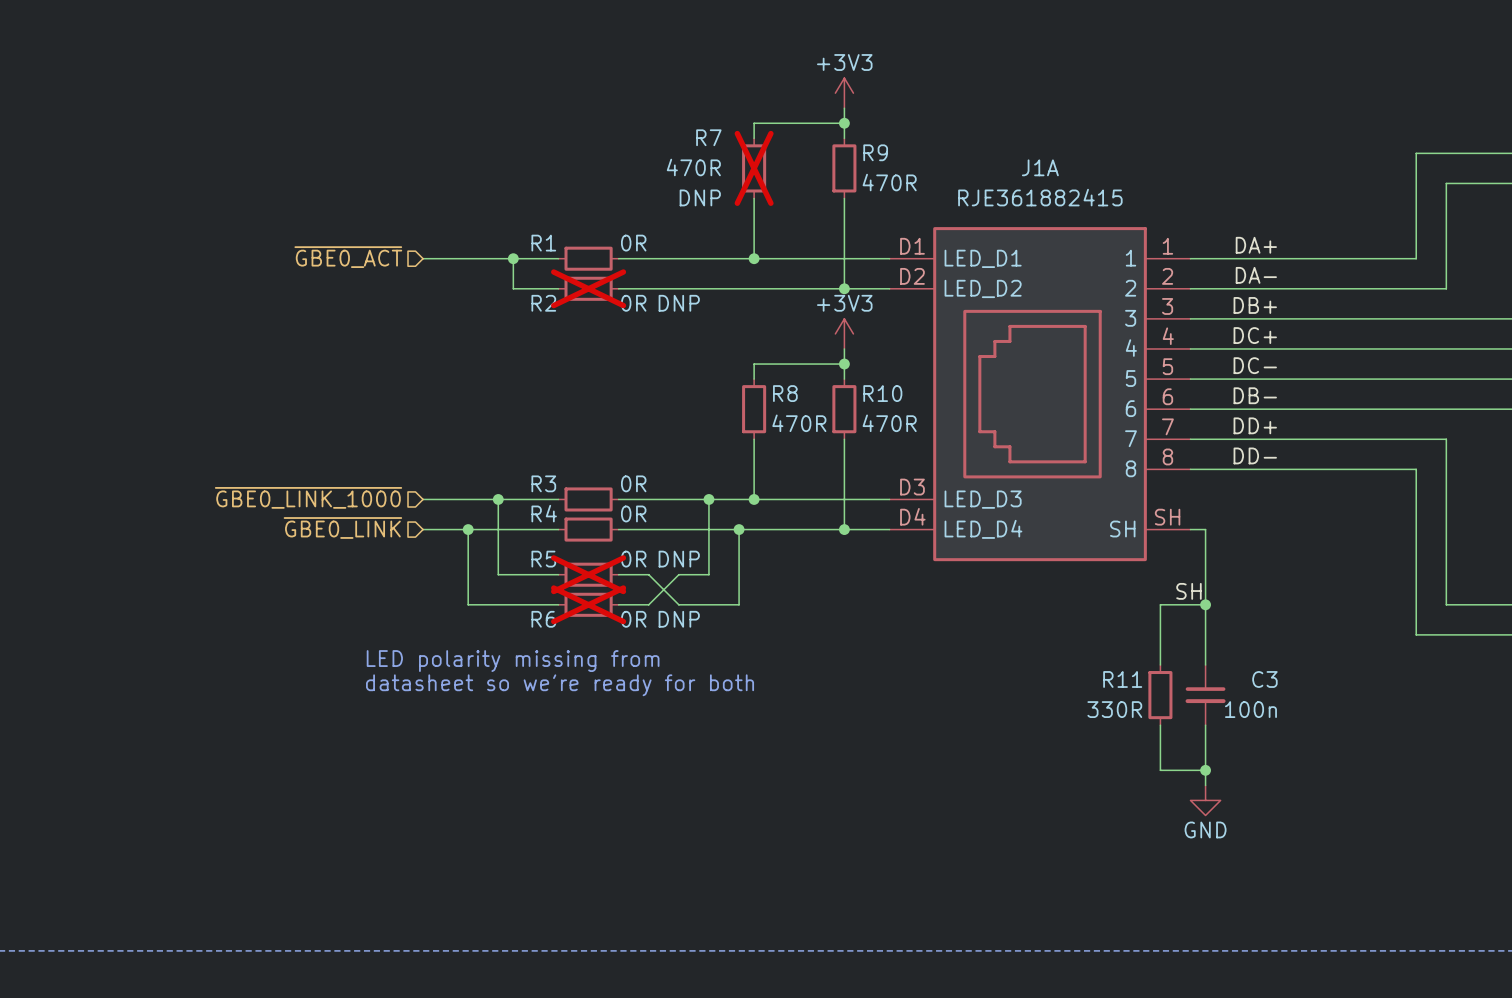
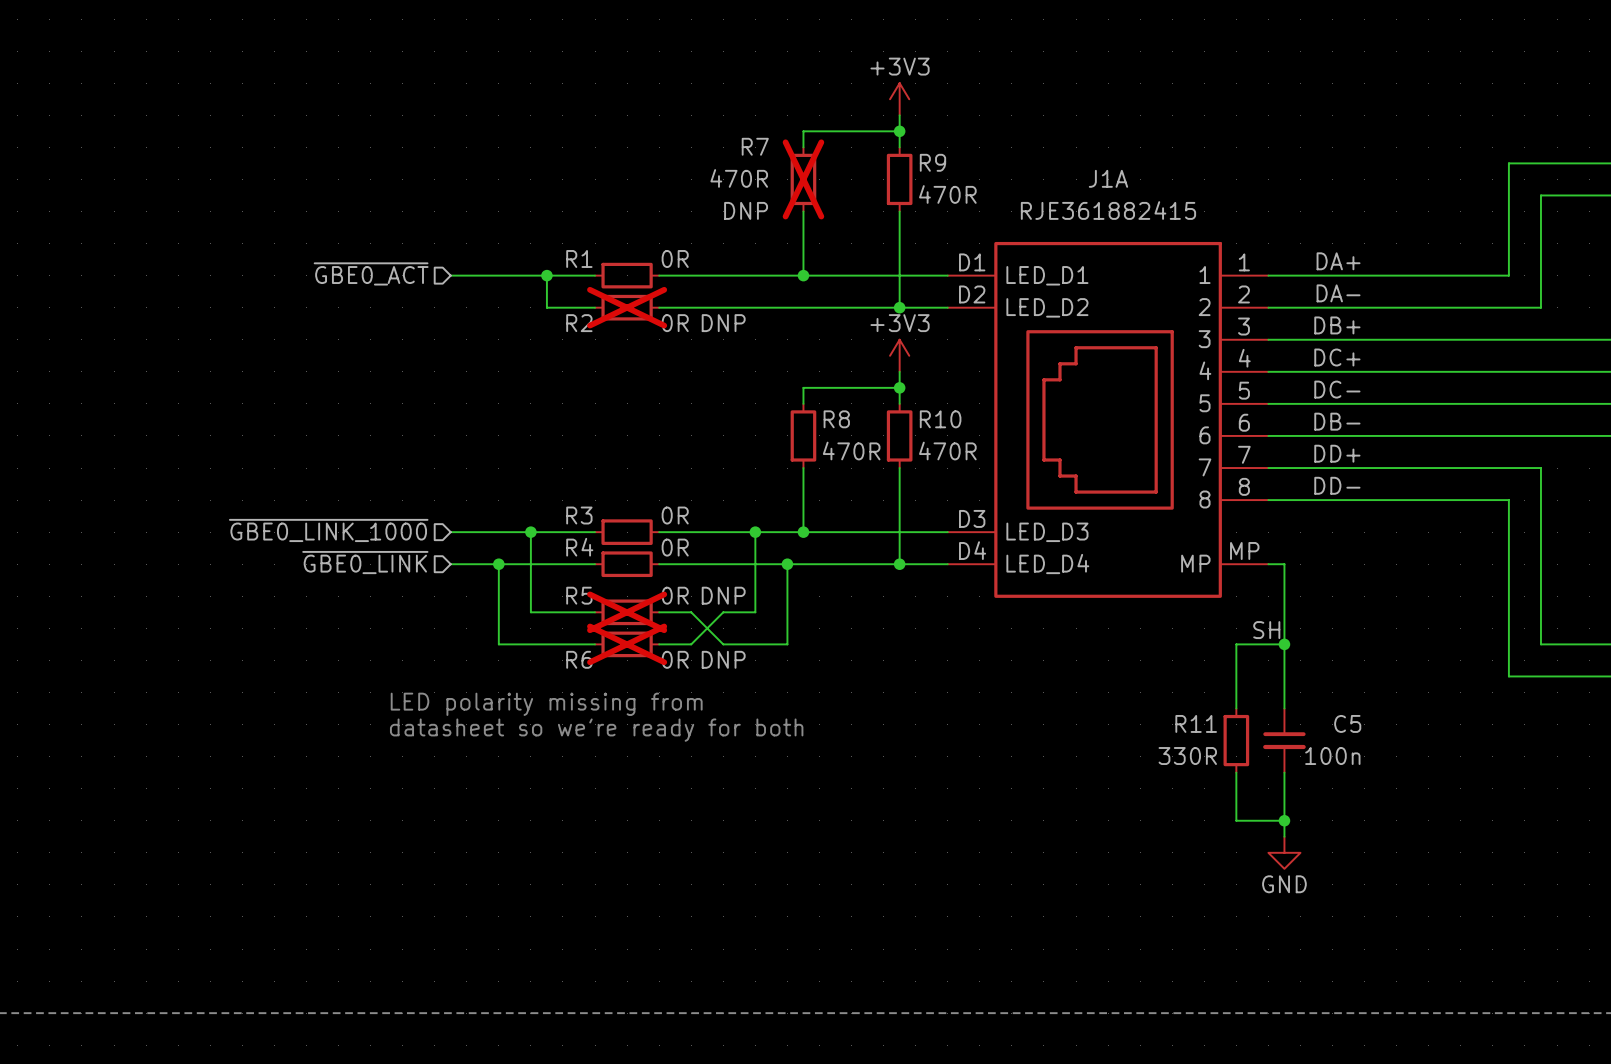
J1A pin number: SH (1167, 517) -> MP (1244, 550)
J1A pin name: SH (1122, 529) -> MP (1195, 563)
C3 name: C3 (1264, 679) -> C5 (1347, 723)

